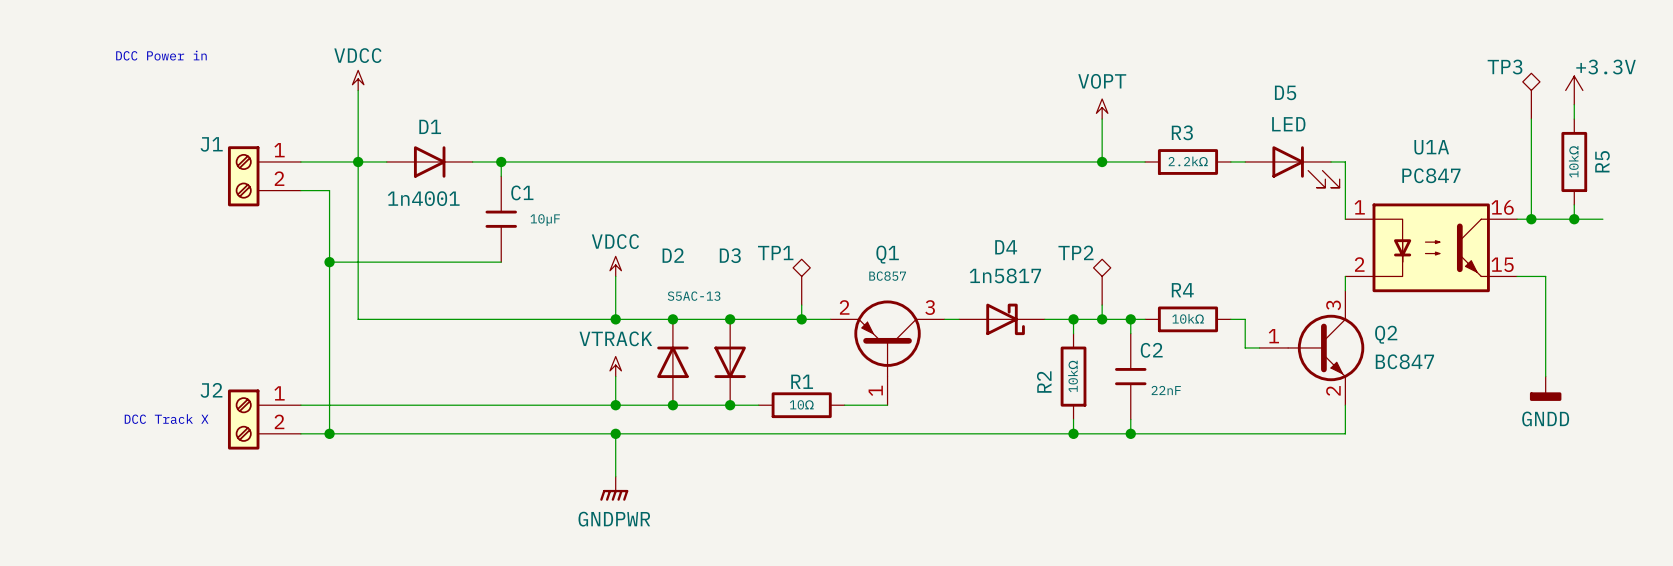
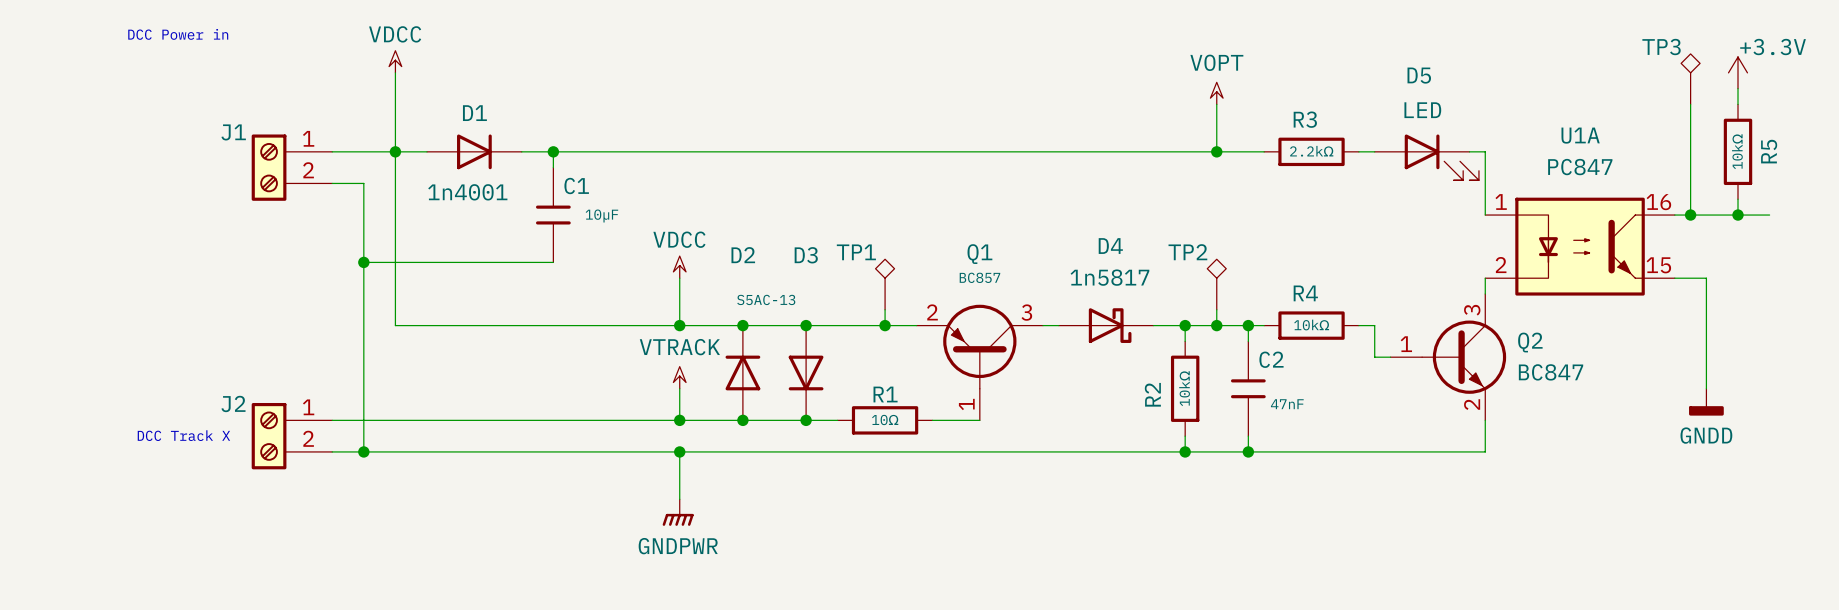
C2 value: 22nF (1166, 390) -> 47nF (1287, 404)

